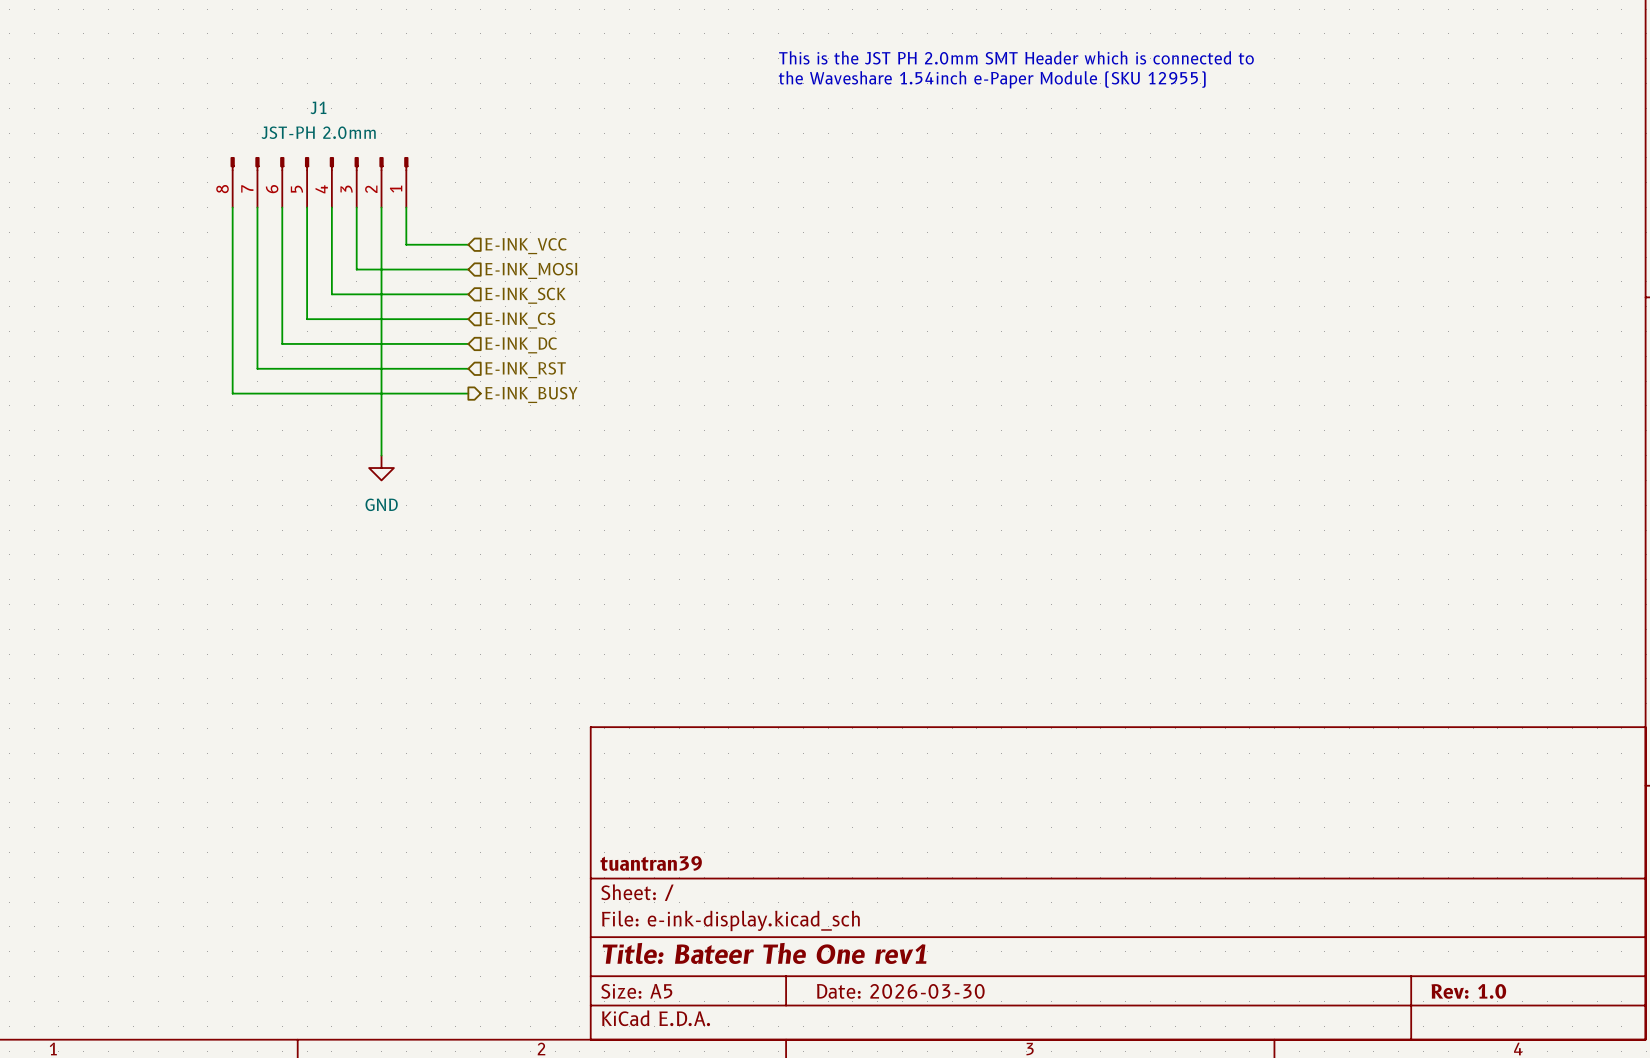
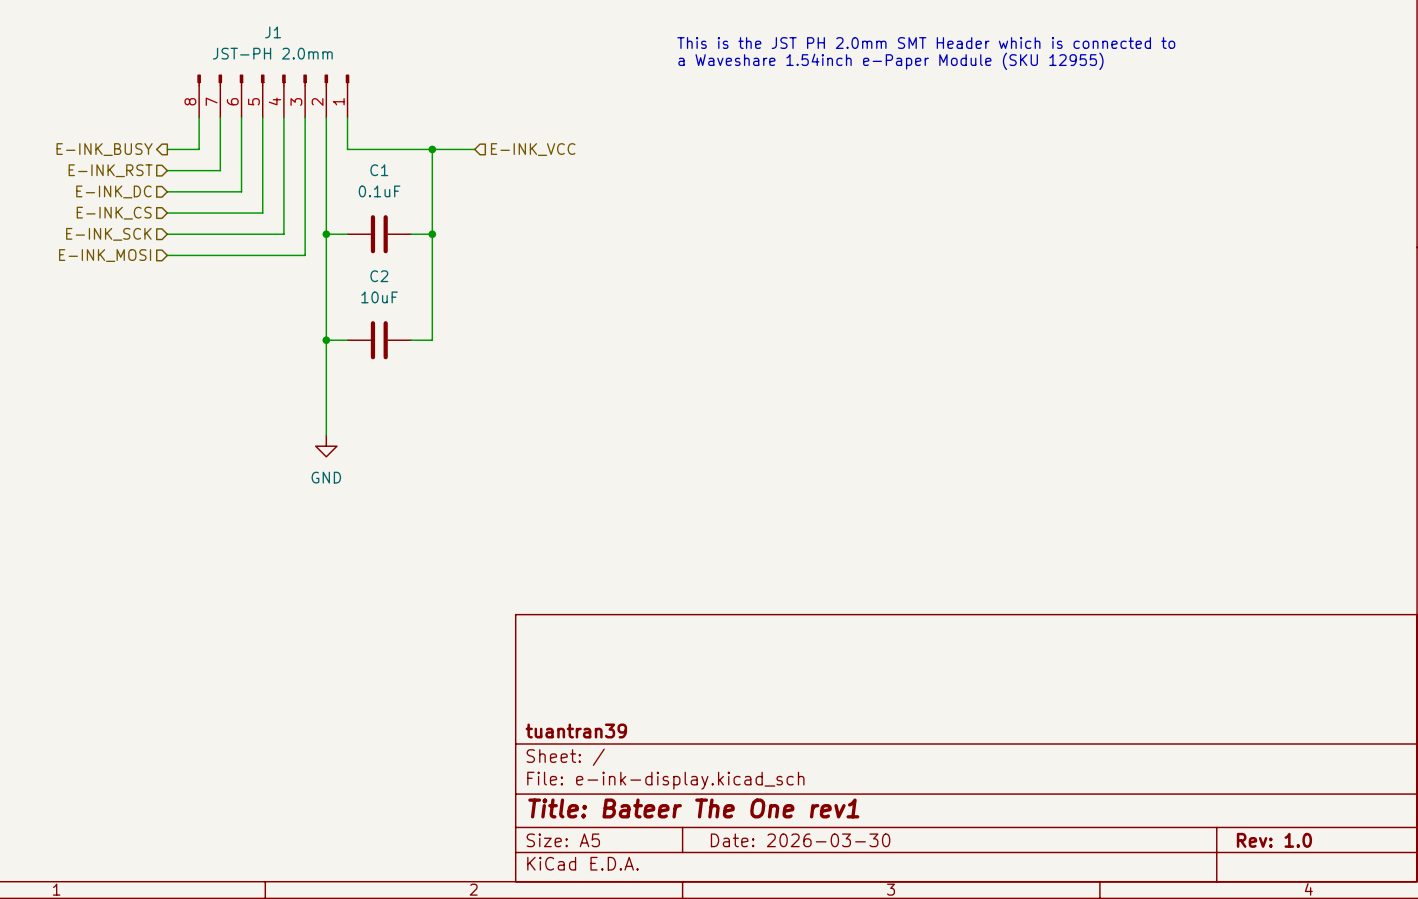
text: the Waveshare 1.54inch e-Paper Module (SKU 12955) (992, 79) -> a Waveshare 1.54inch e-Paper Module (SKU 12955) (890, 61)
wire: none -> (199, 117) (199, 149) (167, 149)
wire: none -> (220, 117) (220, 170) (167, 170)
wire: none -> (241, 117) (241, 191) (167, 191)
wire: none -> (262, 117) (262, 213) (167, 213)
wire: none -> (283, 117) (283, 234) (167, 234)
wire: none -> (305, 117) (305, 255) (167, 255)
wire: none -> (326, 117) (326, 435)
wire: none -> (347, 117) (347, 149) (474, 149)
J1 position: (319, 182) -> (273, 96)
wire: none -> (432, 149) (432, 340) (411, 340)
junction: none -> (432, 149)
hierarchical label: none -> E-INK_BUSY (104, 149)
wire: (232, 207) (232, 393) (468, 393) -> none
wire: (257, 207) (257, 368) (468, 368) -> none
wire: (282, 207) (282, 343) (468, 343) -> none
wire: (307, 207) (307, 319) (468, 319) -> none
wire: (331, 207) (331, 294) (468, 294) -> none
wire: (356, 207) (356, 269) (468, 269) -> none
wire: (381, 207) (381, 455) -> none
wire: (406, 207) (406, 244) (468, 244) -> none
hierarchical label: none -> E-INK_RST (110, 170)
hierarchical label: none -> E-INK_DC (113, 191)
hierarchical label position: E-INK_VCC (526, 246) -> E-INK_VCC (533, 149)
hierarchical label: none -> E-INK_CS (114, 213)
hierarchical label: E-INK_MOSI (531, 270) -> none
wire: none -> (326, 234) (347, 234)
junction: none -> (326, 234)
C1: none -> 0.1uF (379, 234)
wire: none -> (411, 234) (432, 234)
junction: none -> (432, 234)
hierarchical label: none -> E-INK_SCK (108, 234)
hierarchical label: E-INK_SCK (525, 295) -> none
hierarchical label: none -> E-INK_MOSI (105, 255)
hierarchical label: E-INK_CS (520, 320) -> none
hierarchical label: E-INK_DC (521, 345) -> none
hierarchical label: E-INK_RST (525, 370) -> none
hierarchical label: E-INK_BUSY (531, 394) -> none
wire: none -> (326, 340) (347, 340)
junction: none -> (326, 340)
C2: none -> 10uF (379, 340)
power symbol position: GND (381, 468) -> GND (326, 446)

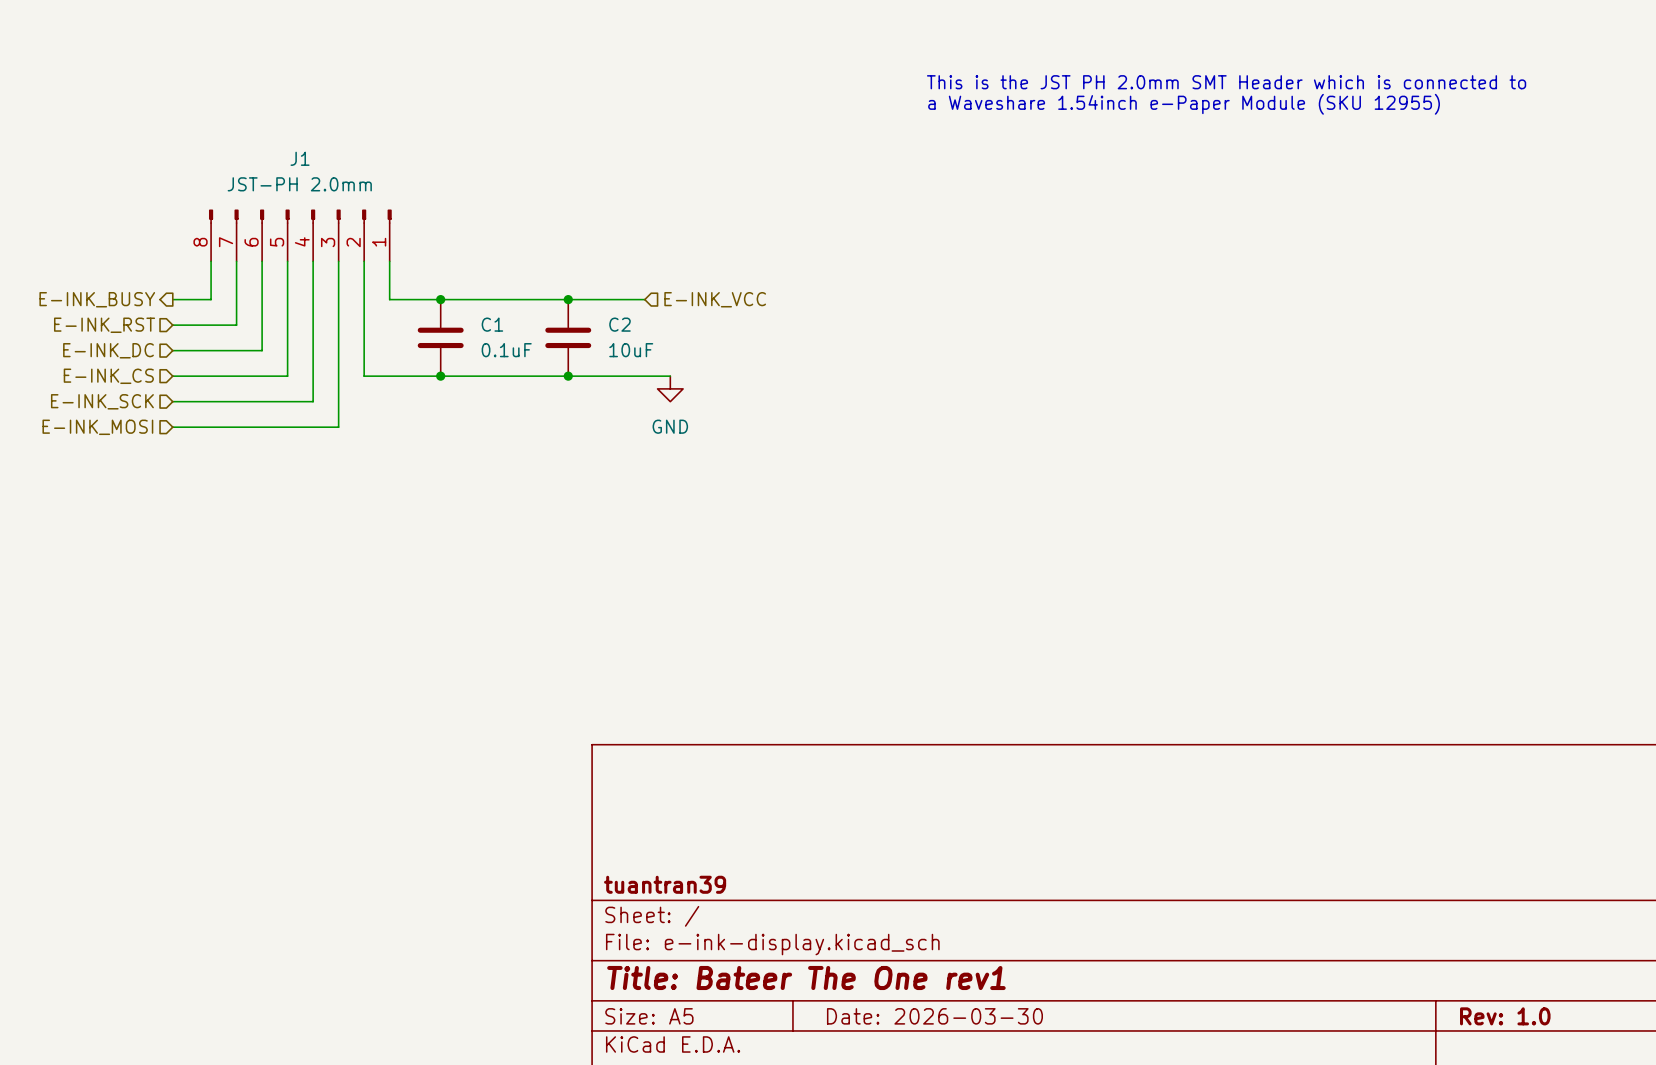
text position: This is the JST PH 2.0mm SMT Header which is connected to (926, 43) -> This is the JST PH 2.0mm SMT Header which is connected to (1226, 82)
text position: a Waveshare 1.54inch e-Paper Module (SKU 12955) (890, 61) -> a Waveshare 1.54inch e-Paper Module (SKU 12955) (1184, 104)
J1 position: (273, 96) -> (300, 235)
wire: (199, 117) (199, 149) (167, 149) -> (211, 261) (211, 299) (172, 299)
wire: (220, 117) (220, 170) (167, 170) -> (236, 261) (236, 325) (172, 325)
wire: (241, 117) (241, 191) (167, 191) -> (262, 261) (262, 350) (172, 350)
wire: (262, 117) (262, 213) (167, 213) -> (287, 261) (287, 376) (172, 376)
wire: (283, 117) (283, 213) -> none
wire: (305, 117) (305, 213) -> none
wire: (326, 117) (326, 213) -> none
wire: (347, 117) (347, 149) (474, 149) -> none
hierarchical label position: E-INK_BUSY (104, 149) -> E-INK_BUSY (97, 299)
wire: (432, 149) (432, 340) (411, 340) -> none
junction: (432, 149) -> none
hierarchical label position: E-INK_VCC (533, 149) -> E-INK_VCC (715, 299)
hierarchical label position: E-INK_RST (110, 170) -> E-INK_RST (104, 325)
C1 name position: C1 (379, 170) -> C1 (492, 324)
hierarchical label position: E-INK_DC (113, 191) -> E-INK_DC (108, 350)
C1 value position: 0.1uF (379, 191) -> 0.1uF (506, 350)
hierarchical label position: E-INK_CS (114, 213) -> E-INK_CS (108, 376)
wire: none -> (389, 261) (389, 299) (644, 299)
hierarchical label position: E-INK_SCK (108, 234) -> E-INK_SCK (102, 401)
wire: (167, 234) (283, 234) -> (172, 401) (313, 401) (313, 286)
wire: (326, 234) (347, 234) -> none
junction: (326, 234) -> none
C1 rotation: 0° (379, 234) -> 90° clockwise (440, 337)
C1 position: (379, 234) -> (440, 337)
wire: (411, 234) (432, 234) -> none
junction: (432, 234) -> none
junction: none -> (440, 299)
junction: none -> (568, 299)
hierarchical label position: E-INK_MOSI (105, 255) -> E-INK_MOSI (97, 427)
wire: (167, 255) (305, 255) -> (172, 427) (338, 427) (338, 312)
C2 name position: C2 (379, 276) -> C2 (619, 324)
wire: (326, 308) (326, 435) -> (364, 376) (670, 376)
junction: none -> (440, 376)
junction: none -> (568, 376)
power symbol: none -> GND (670, 388)
wire: (326, 340) (347, 340) -> none
junction: (326, 340) -> none
C2 rotation: 0° (379, 340) -> 90° clockwise (568, 337)
C2 position: (379, 340) -> (568, 337)
power symbol: GND (326, 446) -> none

